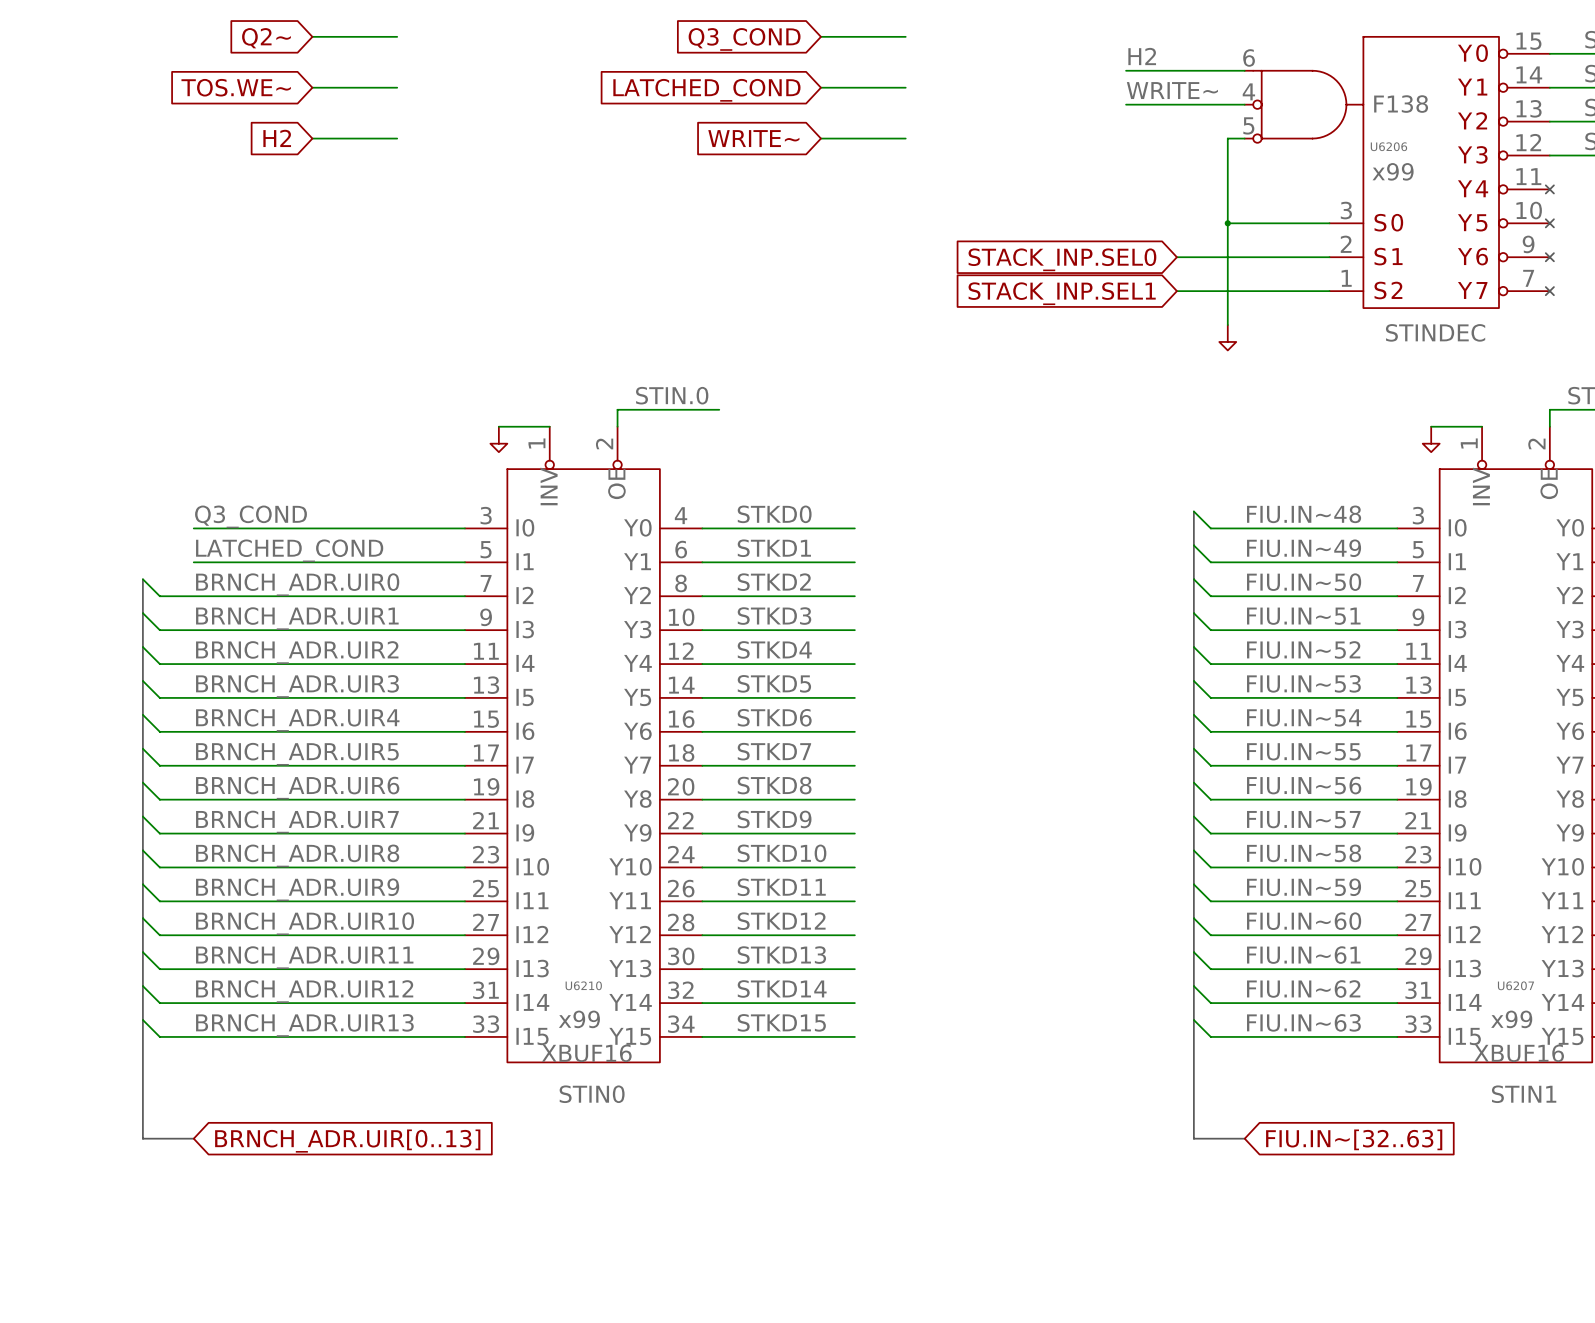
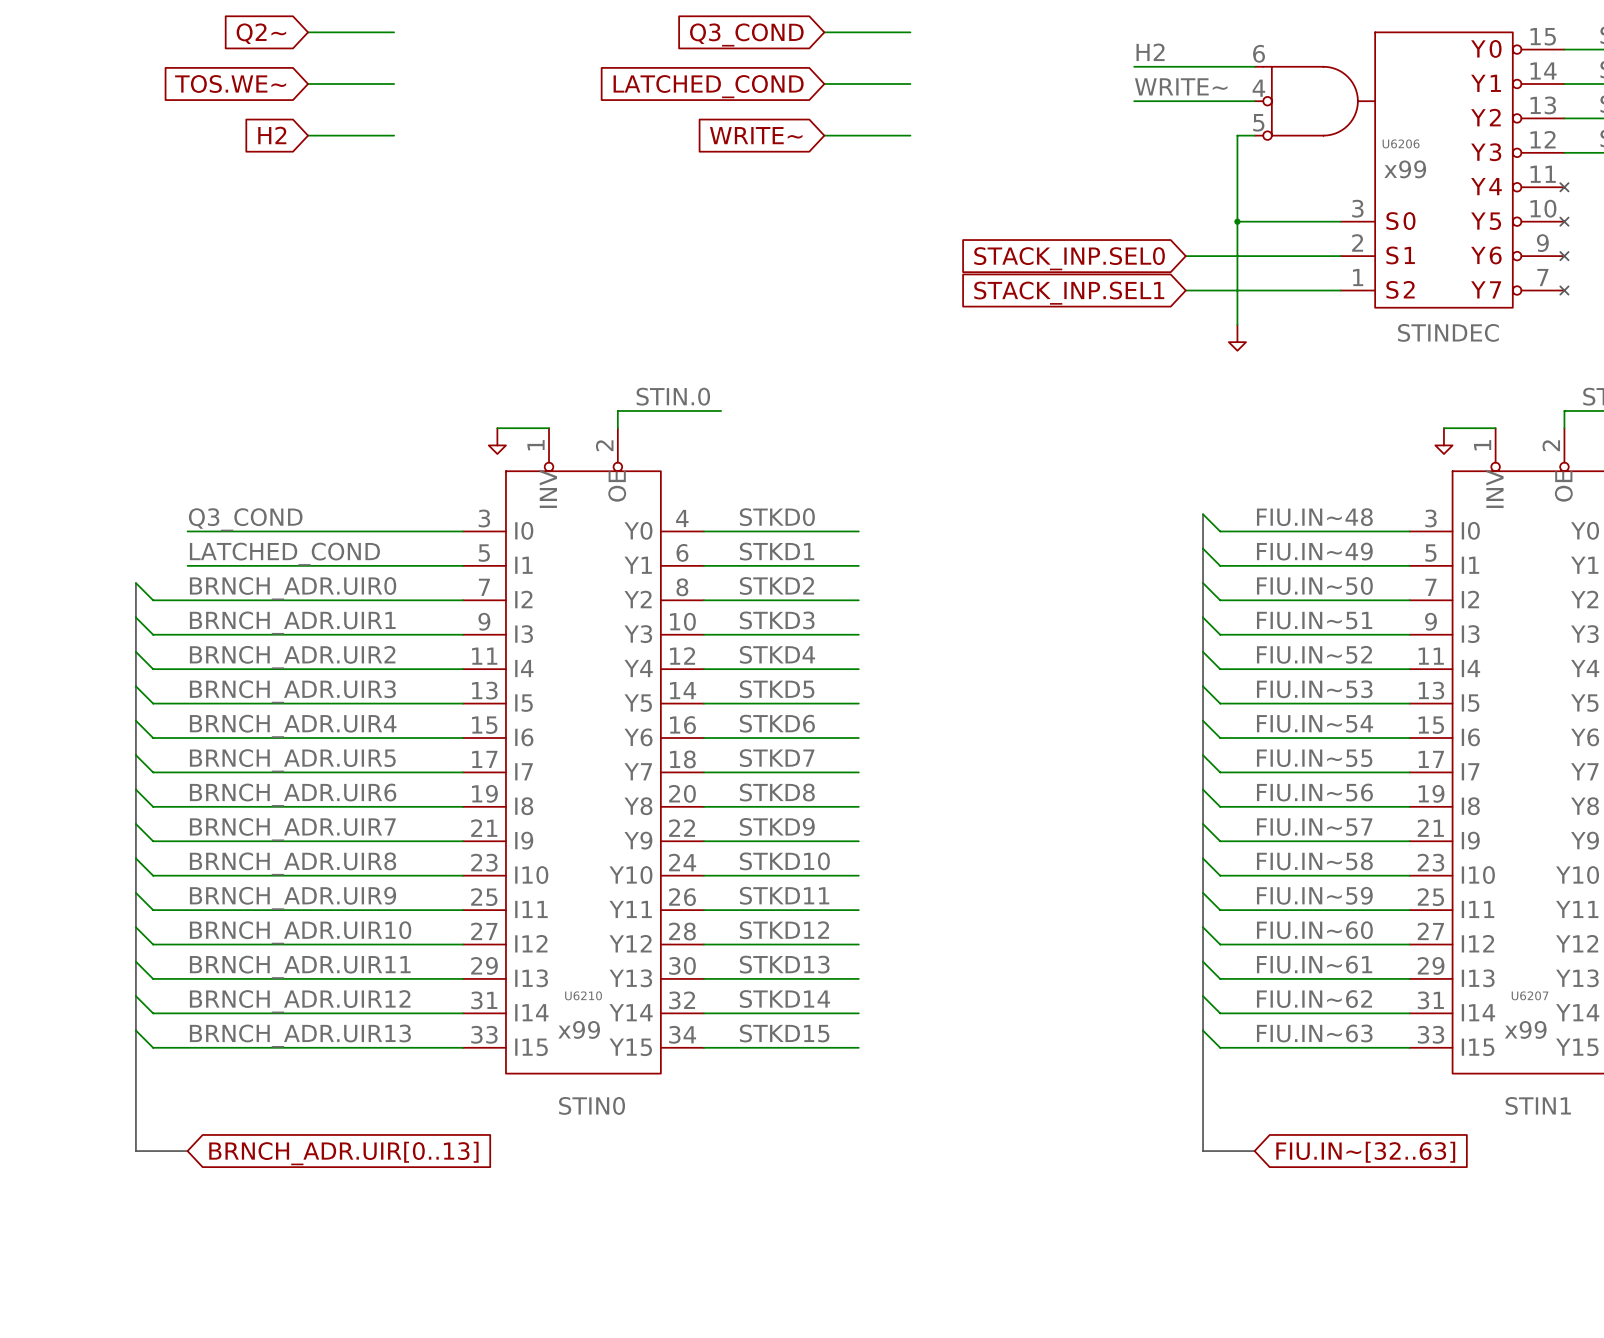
U6206 value: F138 (1401, 104) -> none
U6210 value: XBUF16 (586, 1053) -> none
U6207 value: XBUF16 (1519, 1053) -> none

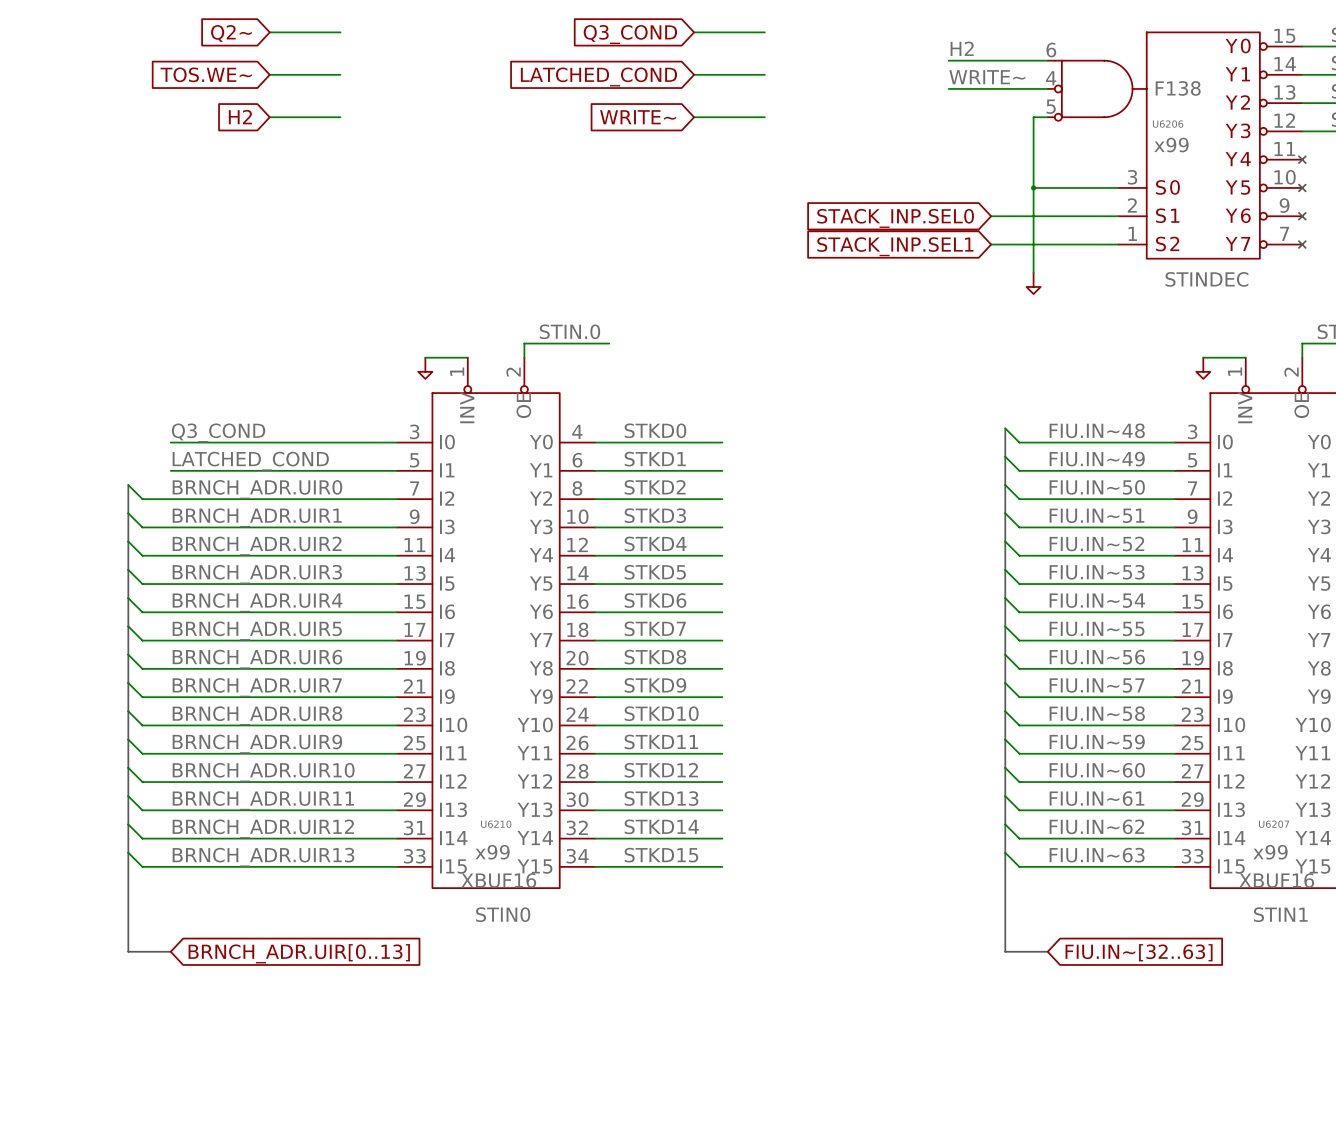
U6206 value: none -> F138 (1178, 88)
U6210 value: none -> XBUF16 (498, 880)
U6207 value: none -> XBUF16 (1276, 880)

